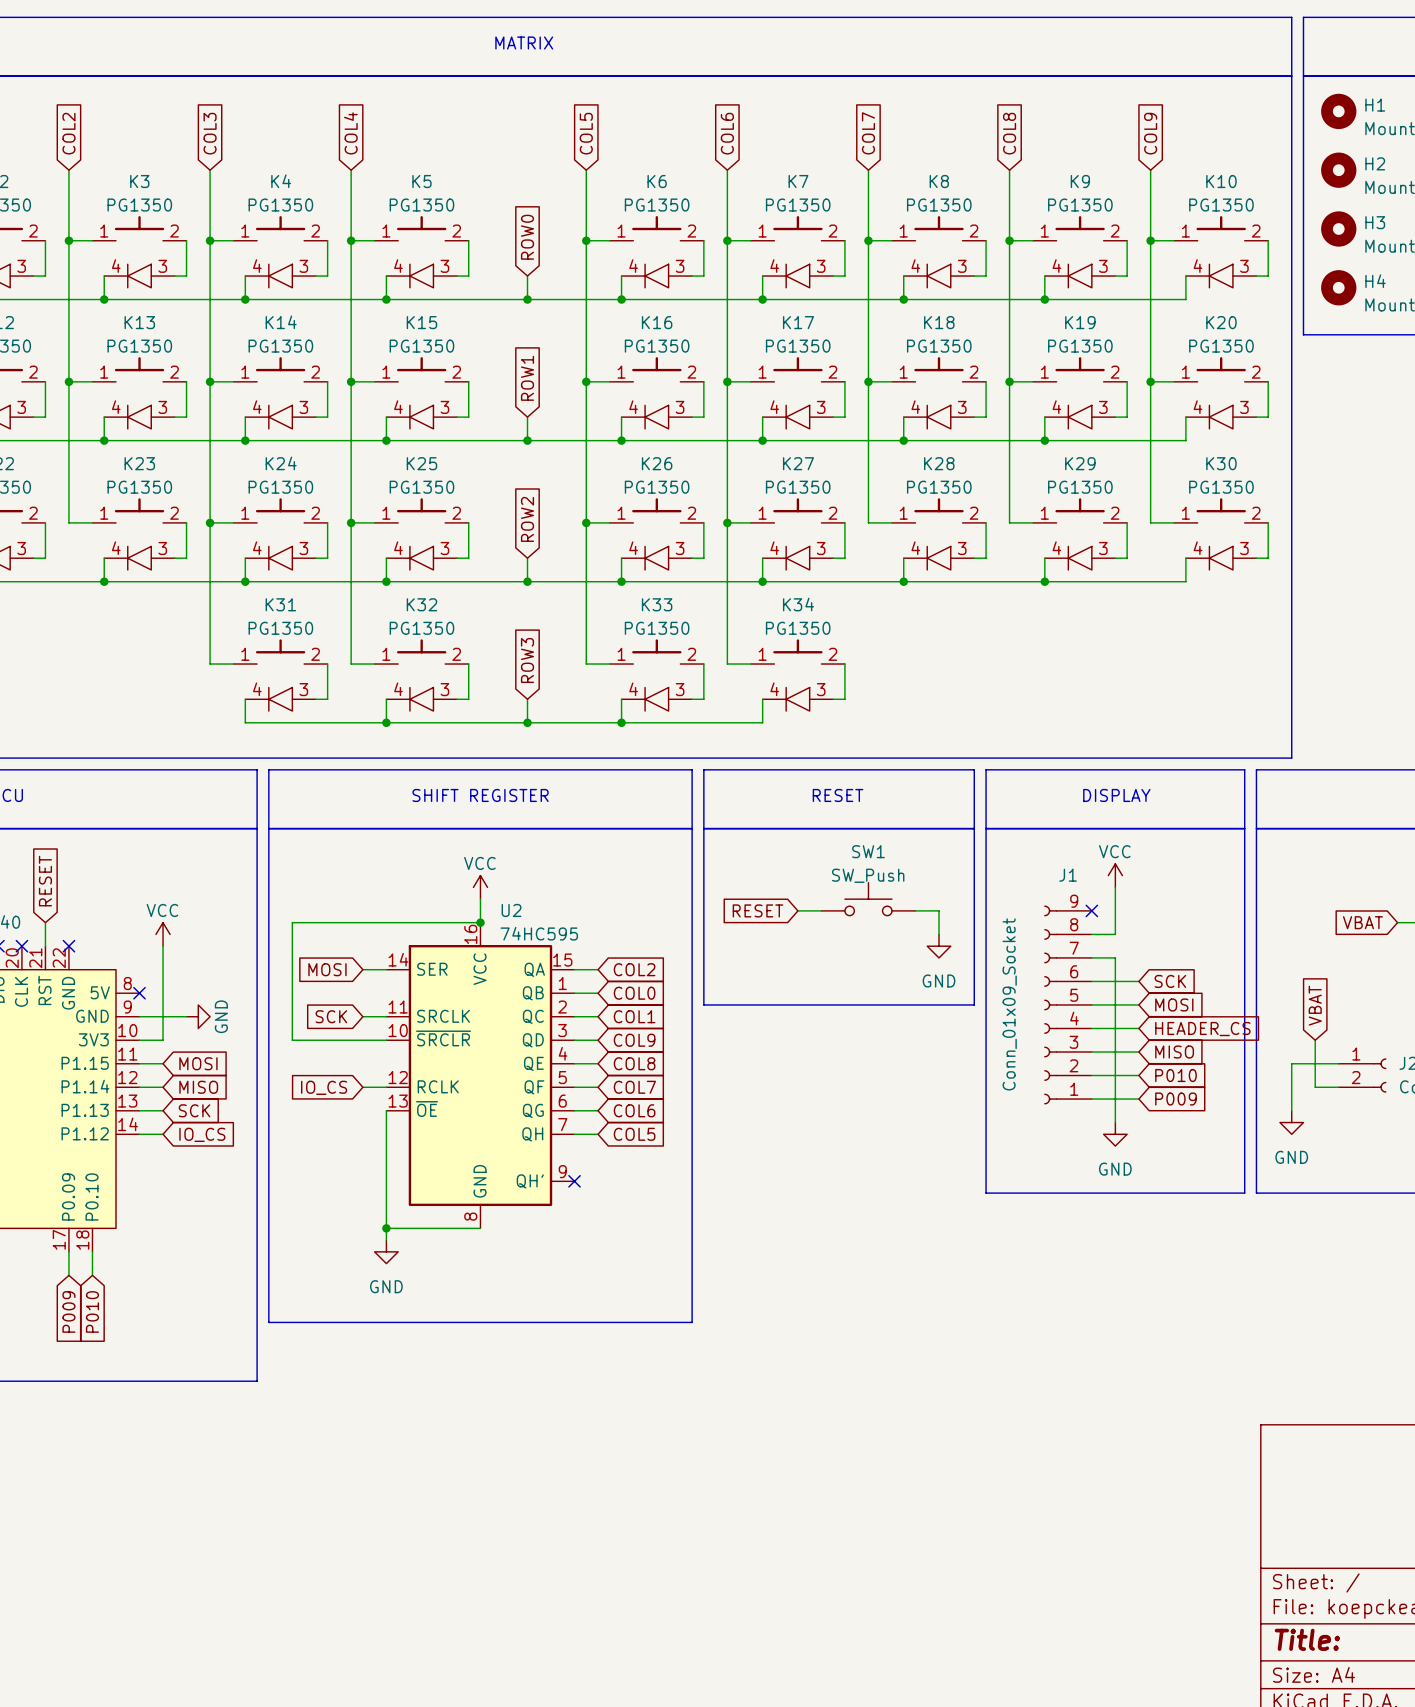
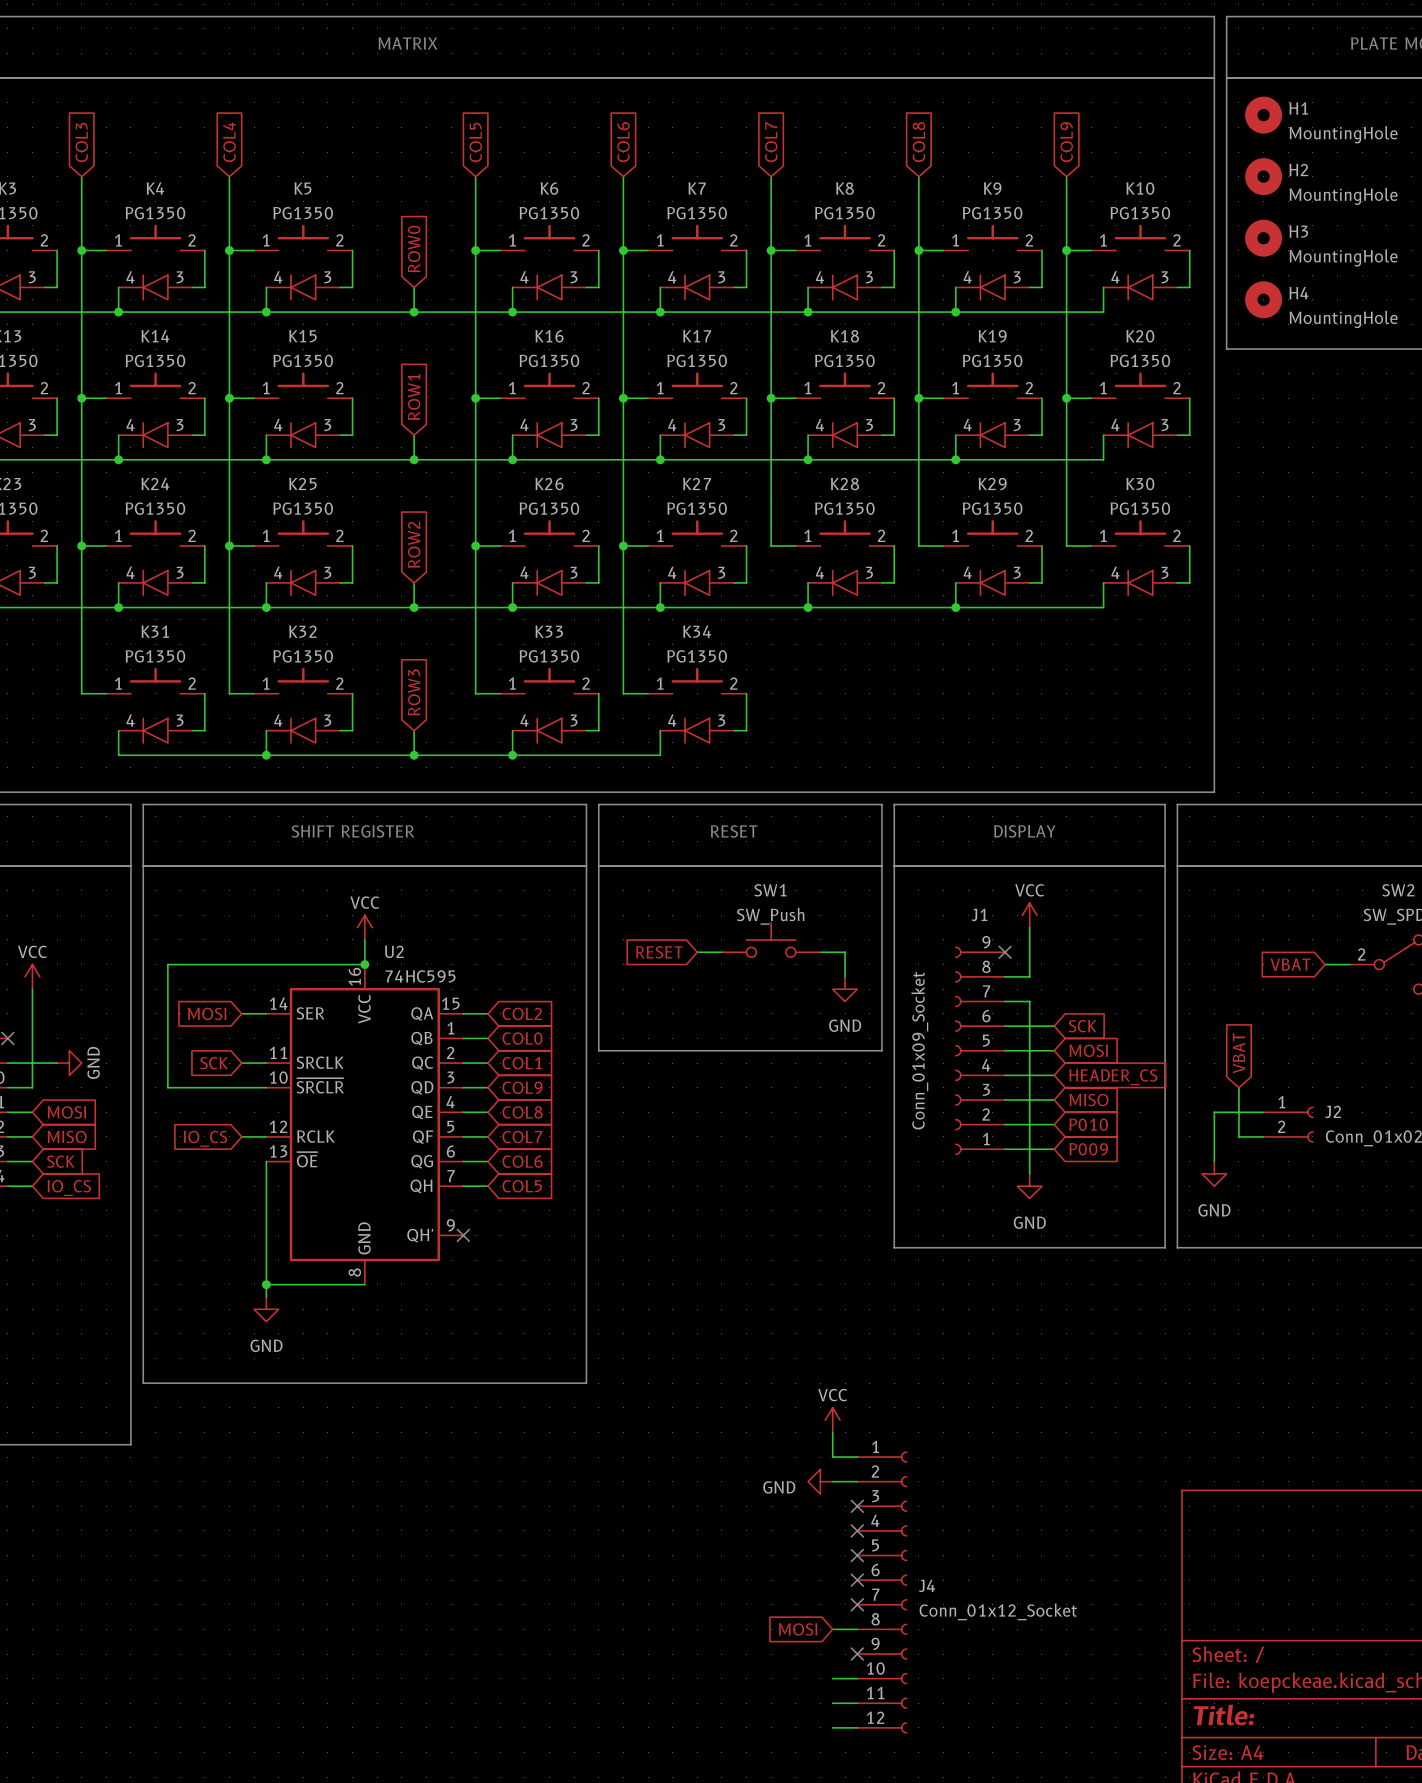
power symbol: none -> VCC (832, 1420)
wire: none -> (832, 1432) (832, 1457) (857, 1457)
power symbol: none -> GND (820, 1481)
wire: none -> (832, 1481) (857, 1481)
no-connect mark: none -> (857, 1506)
no-connect mark: none -> (857, 1530)
no-connect mark: none -> (857, 1555)
no-connect mark: none -> (857, 1580)
J4: none -> Conn_01x12_Socket (882, 1592)
no-connect mark: none -> (857, 1604)
global label: none -> MOSI (798, 1629)
wire: none -> (832, 1629) (857, 1629)
no-connect mark: none -> (857, 1654)
wire: none -> (832, 1678) (857, 1678)
wire: none -> (832, 1703) (857, 1703)
wire: none -> (832, 1727) (857, 1727)

